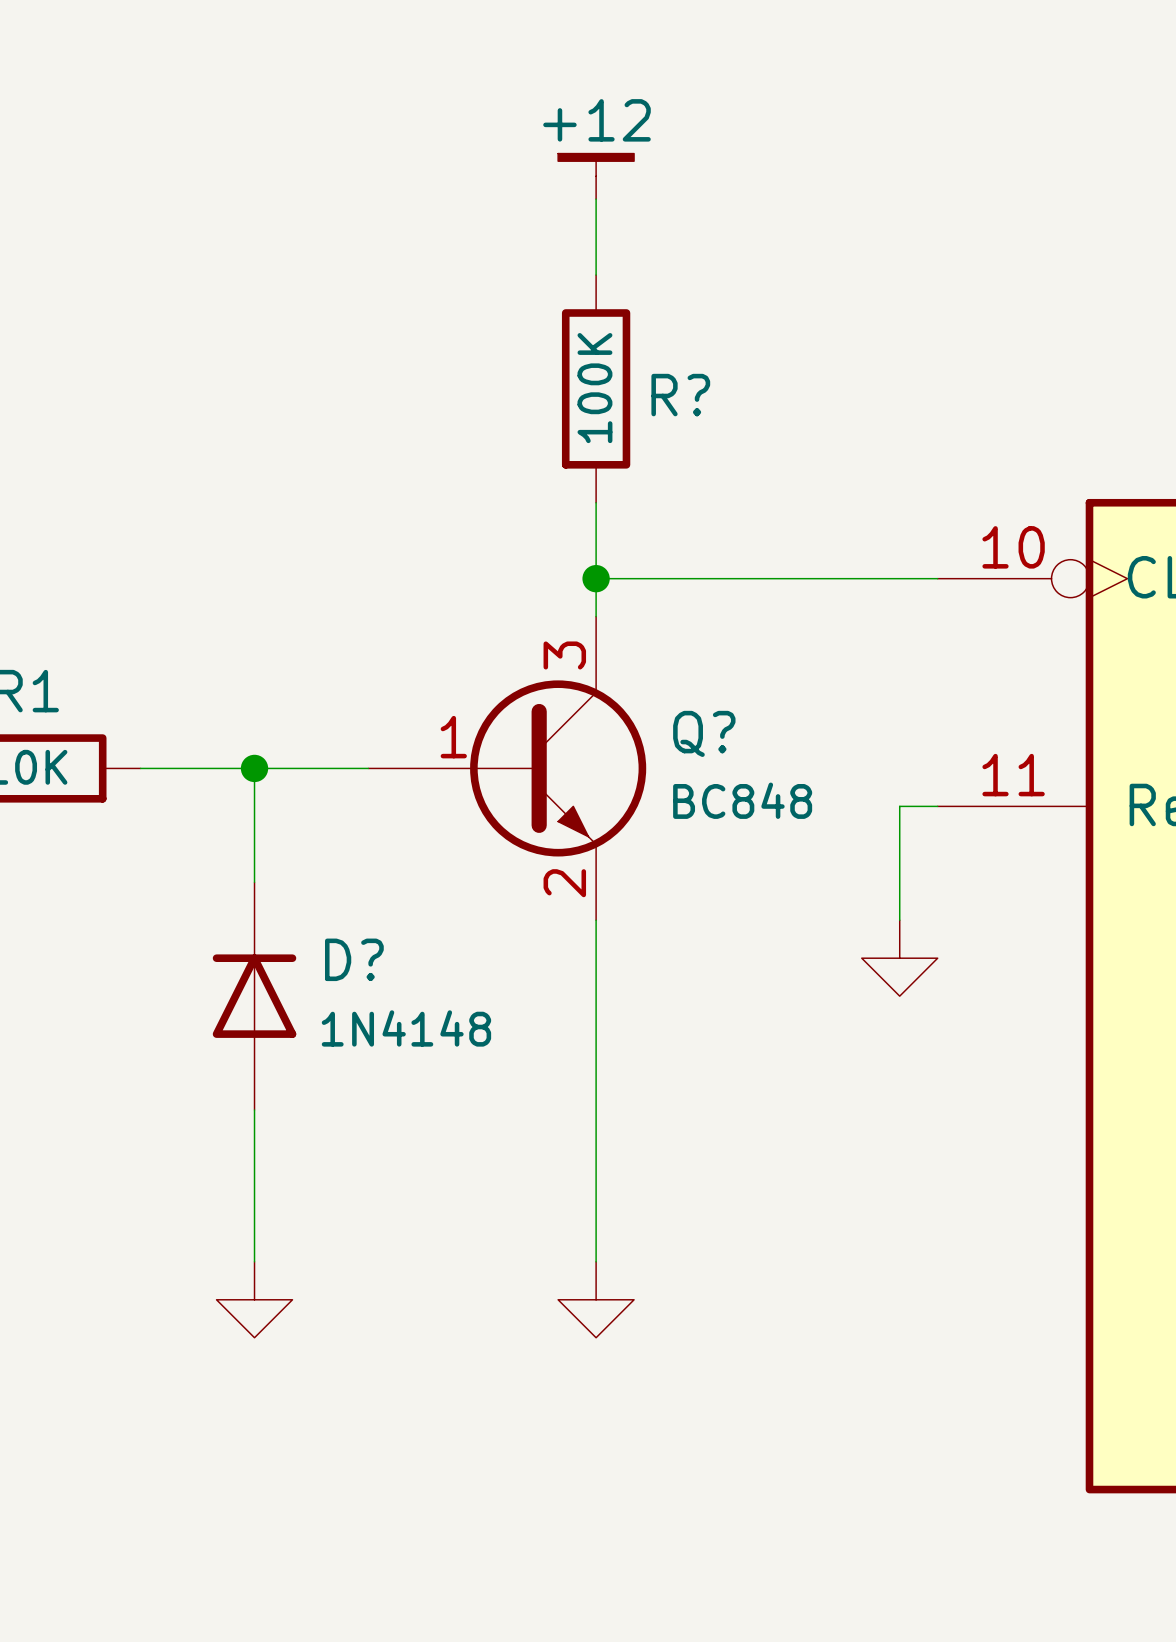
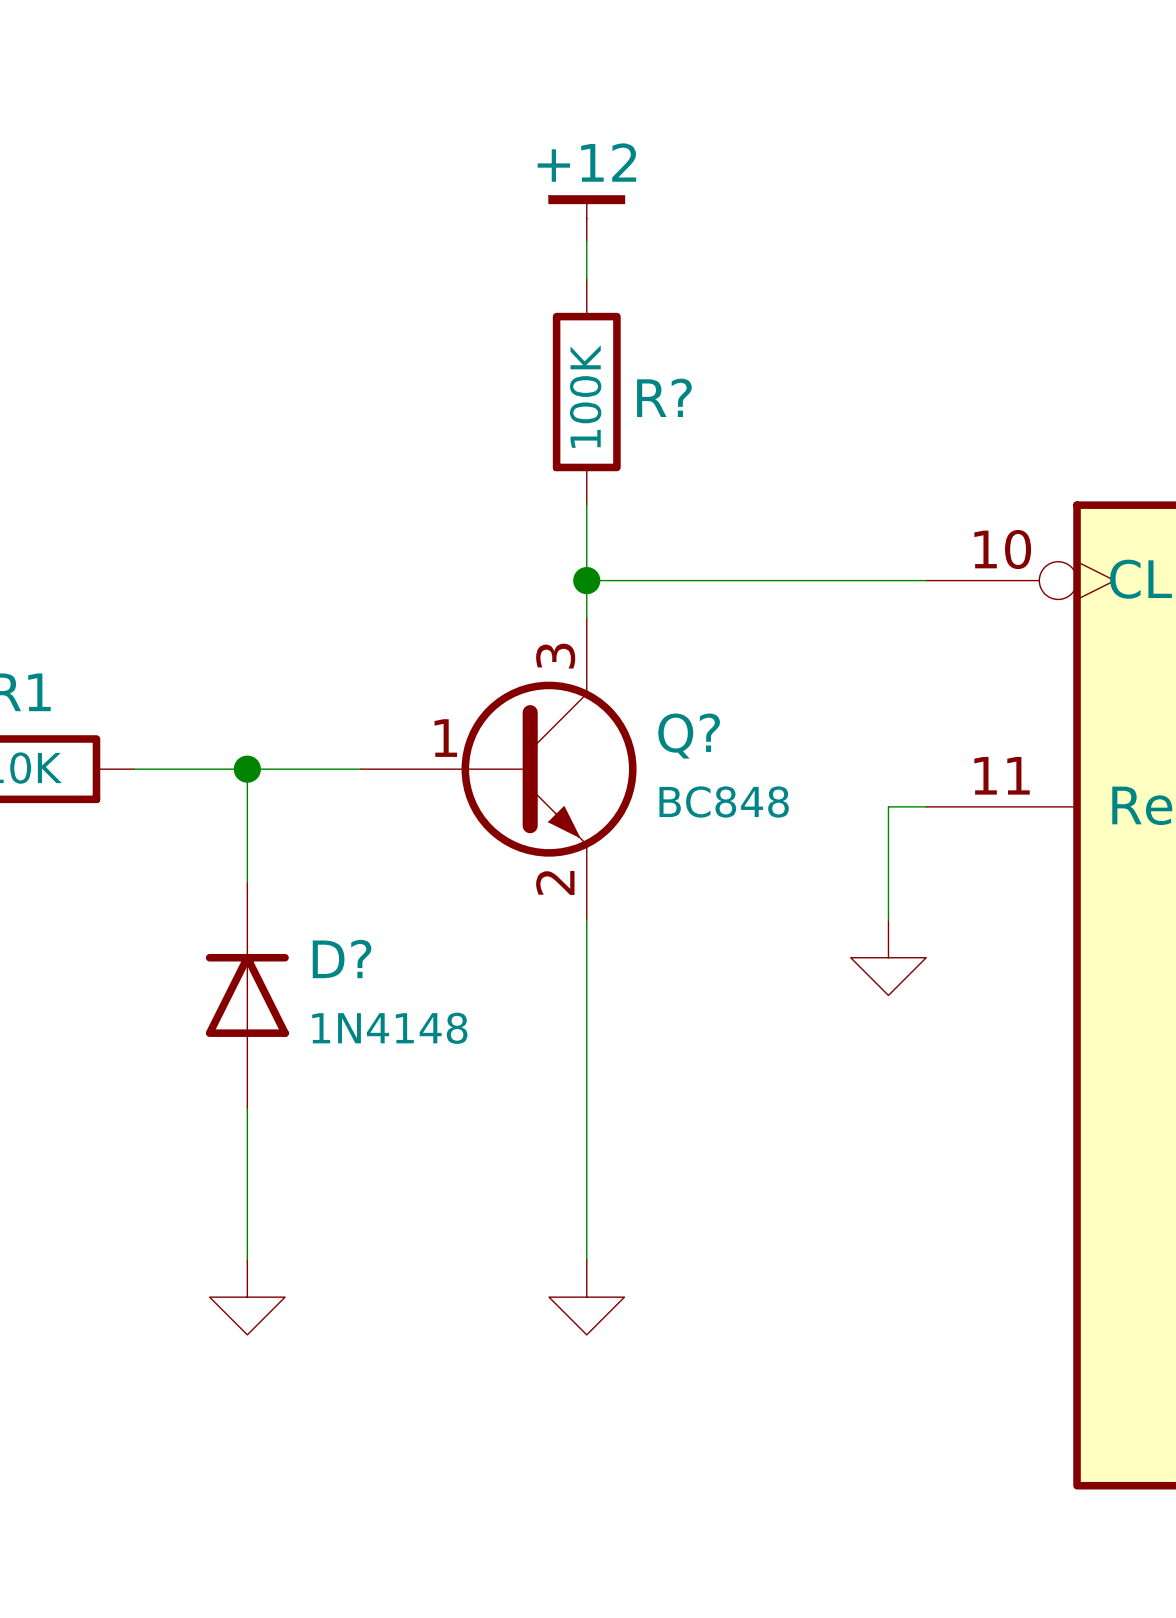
power symbol position: +12 (596, 176) -> +12 (586, 218)

